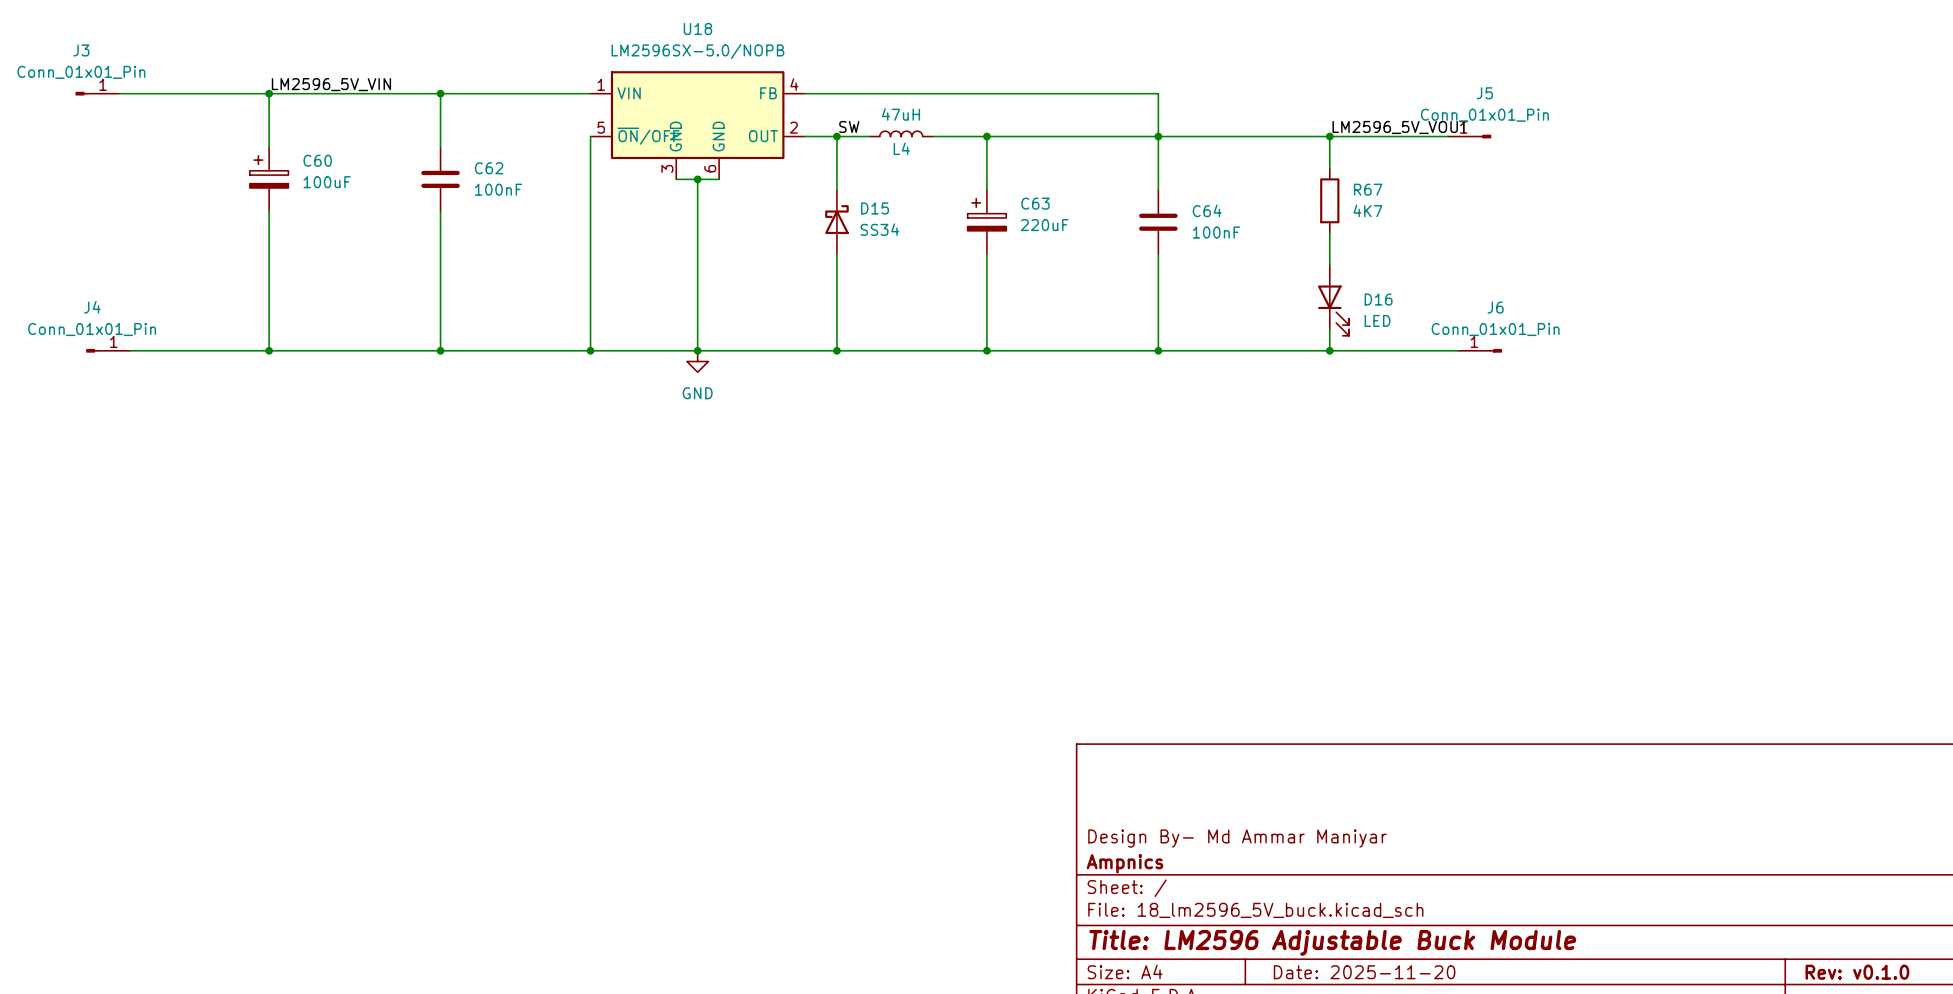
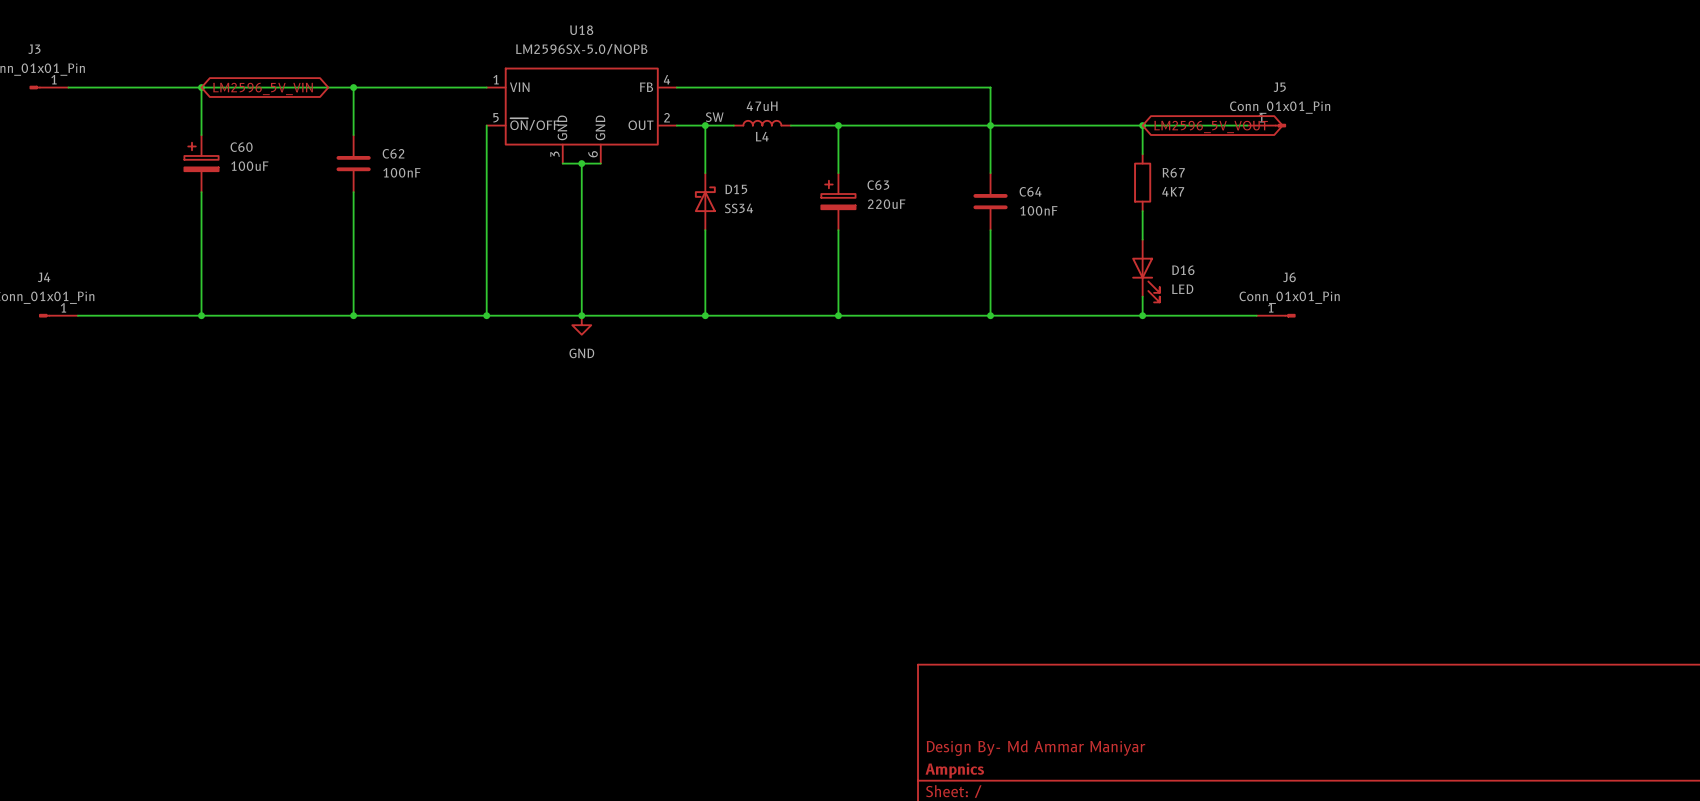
label: LM2596_5V_VIN (331, 84) -> none
global label: none -> LM2596_5V_VIN (263, 88)
label: LM2596_5V_VOUT (1400, 127) -> none
global label: none -> LM2596_5V_VOUT (1211, 126)

